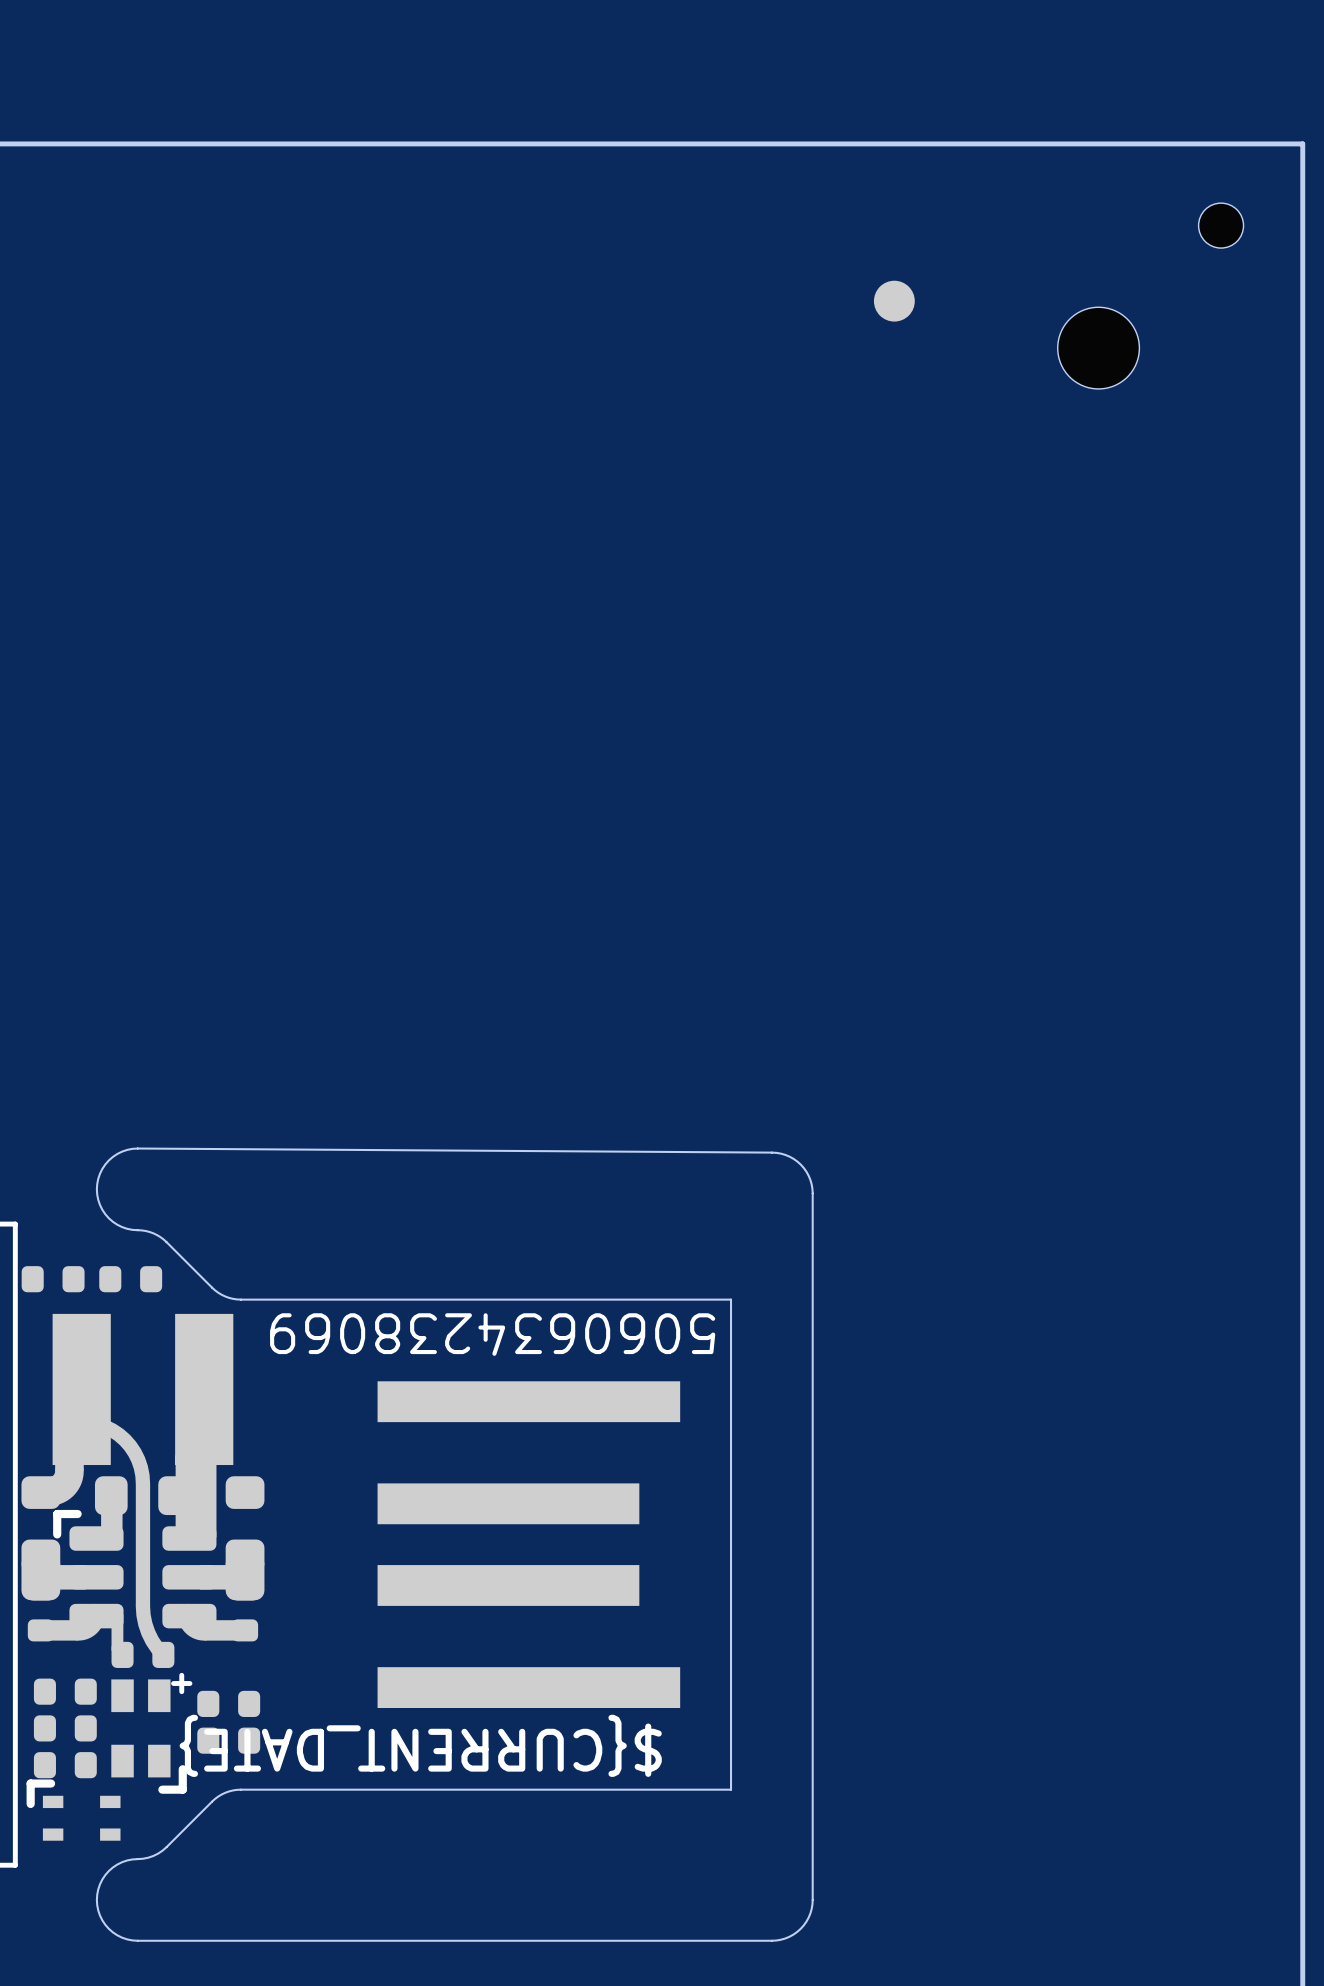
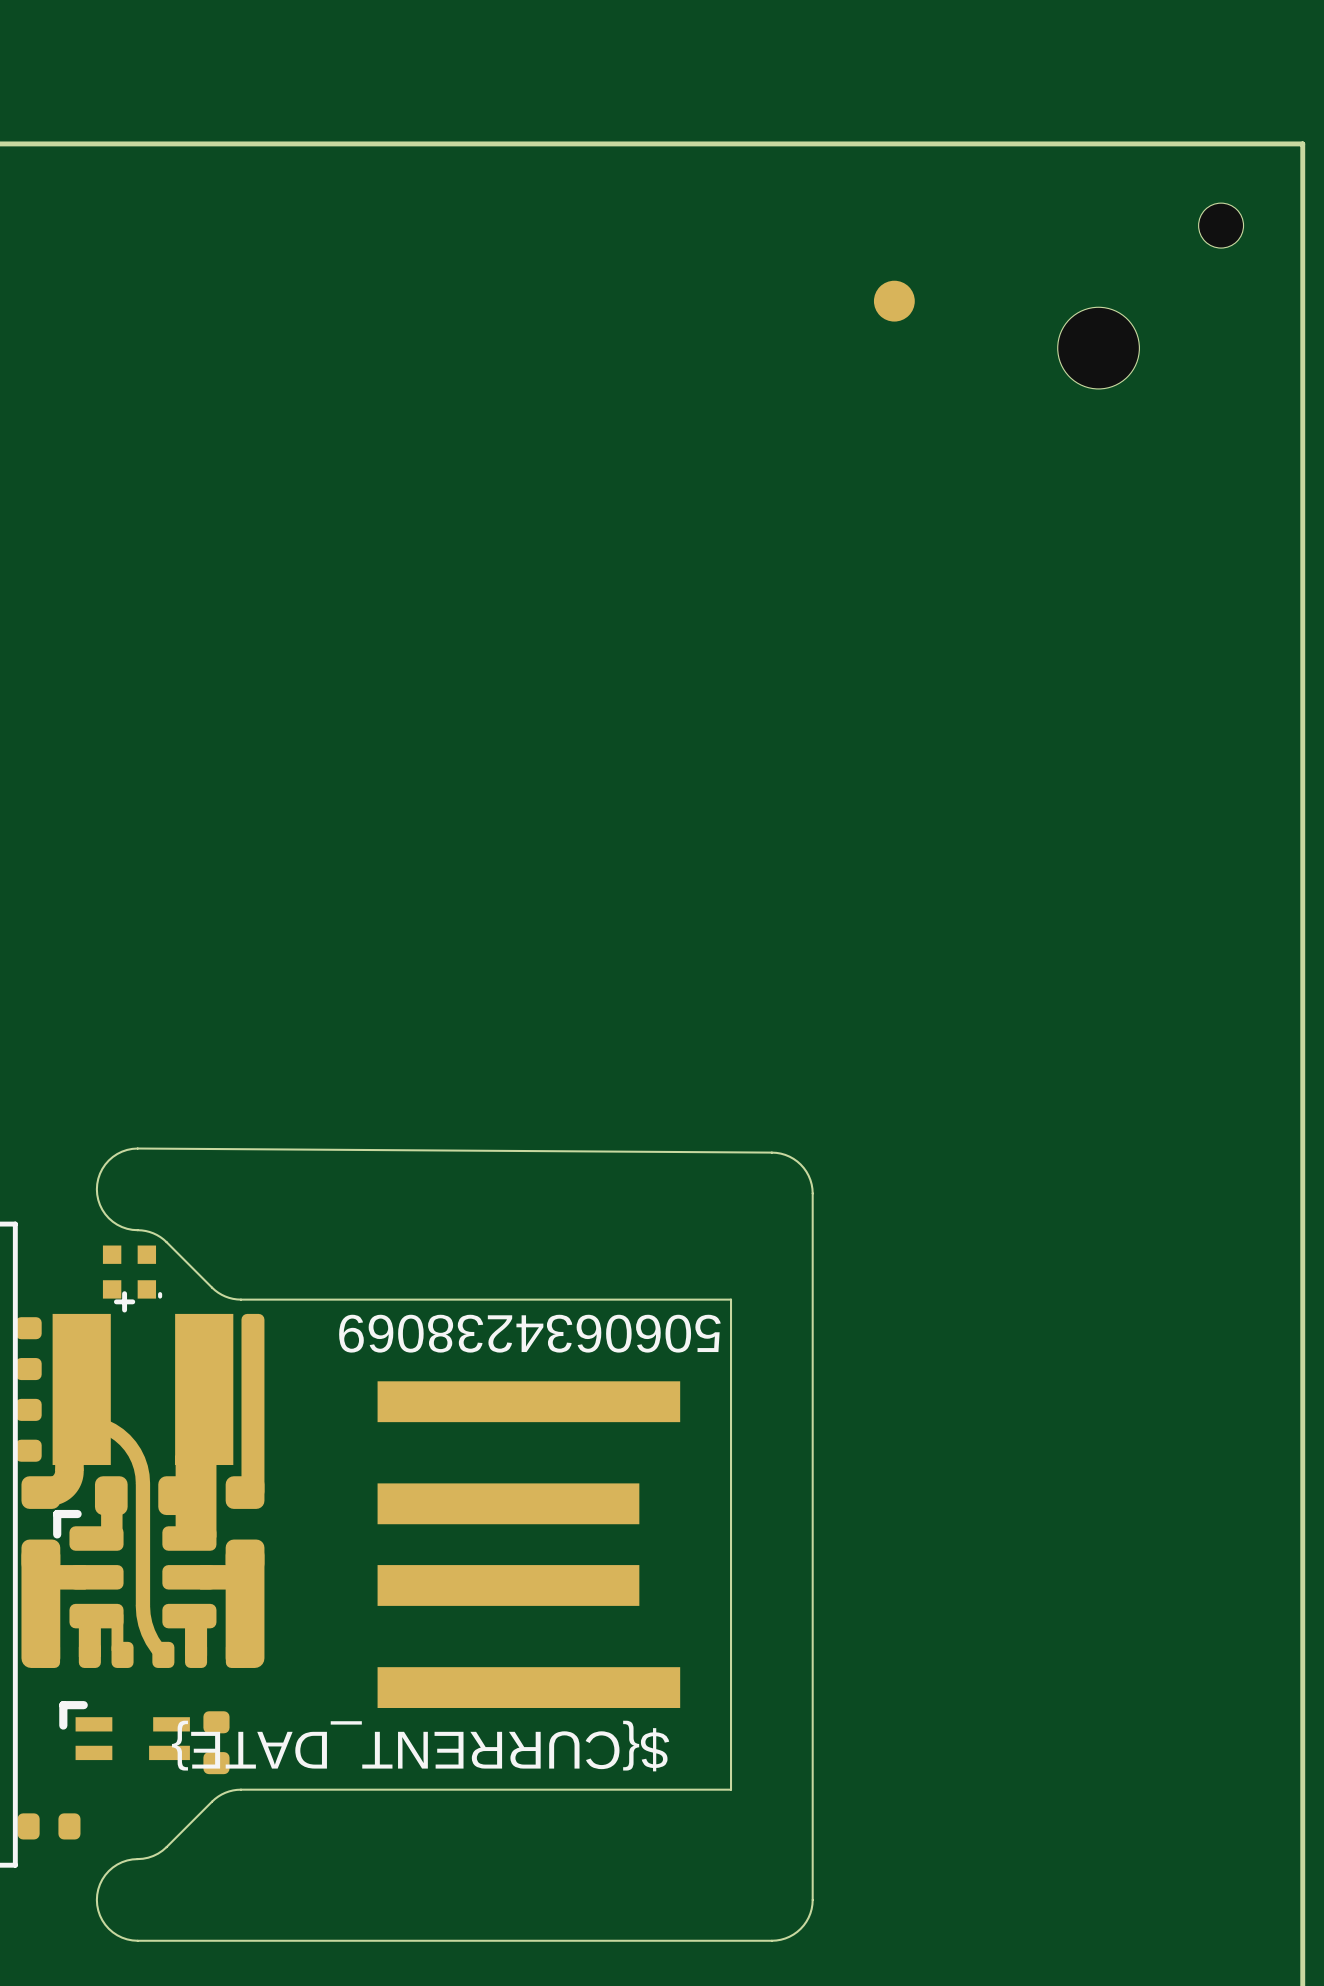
part footprint: [99, 1266, 163, 1293] -> [102, 1245, 163, 1313]
part rotation: 0° (53, 1279) -> 90° clockwise (28, 1348)
part position: (53, 1279) -> (28, 1348)
part footprint: [21, 1313, 265, 1668] -> [21, 1313, 265, 1668]
part: none -> (28, 1430)
part footprint: [111, 1672, 193, 1794] -> [59, 1701, 190, 1761]
part: (65, 1691) -> none
part: (228, 1703) -> none
part: (65, 1728) -> none
part rotation: 0° (228, 1740) -> 90° clockwise (216, 1742)
part: (65, 1765) -> none
part footprint: [26, 1779, 121, 1841] -> [17, 1813, 81, 1840]

